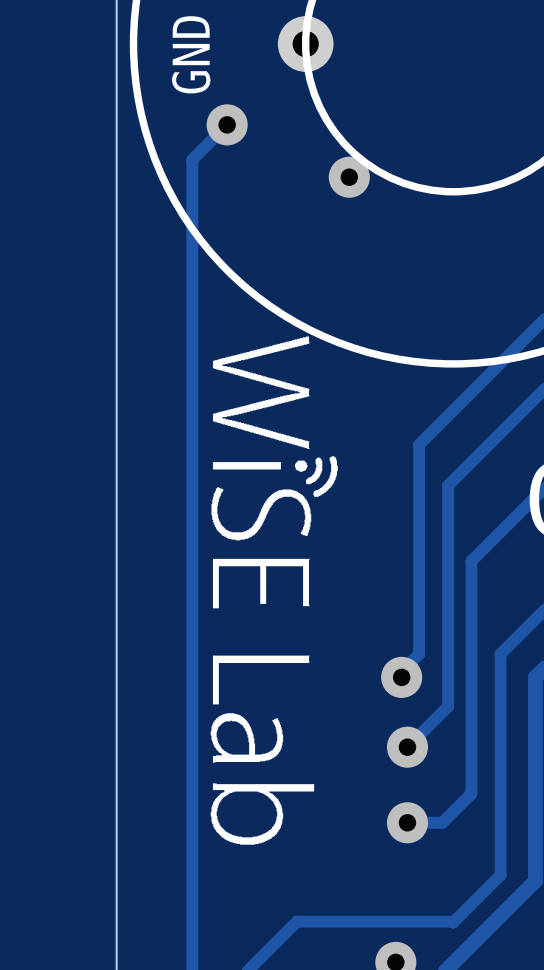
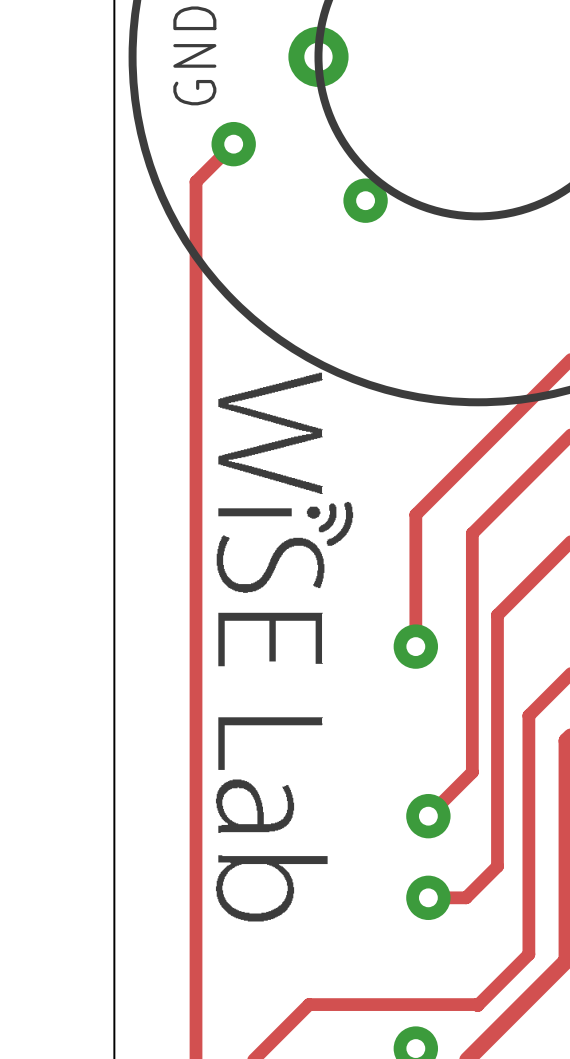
track: (419, 444) (419, 654) (401, 671) (401, 677) -> (440, 489) (415, 514) (415, 646)
via position: (401, 677) -> (415, 646)

